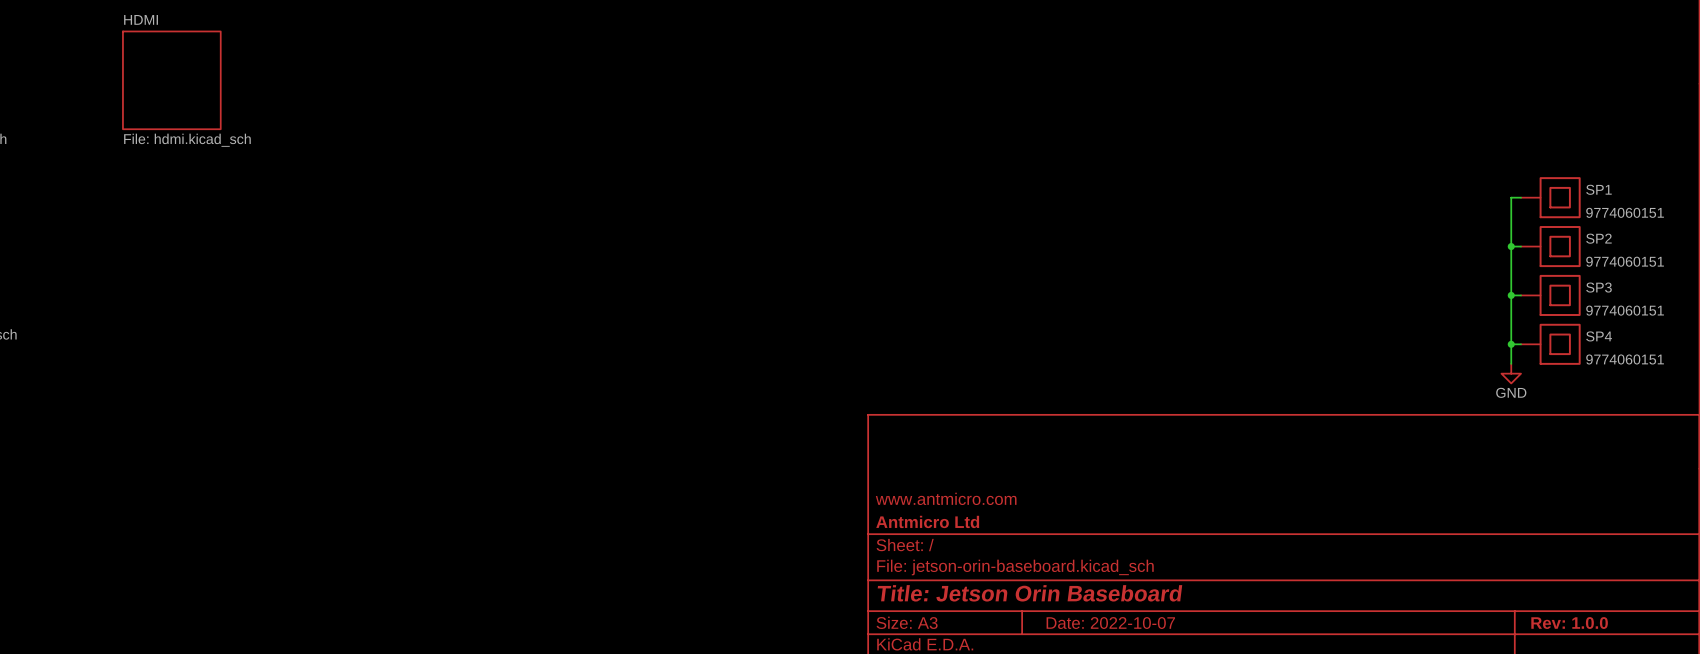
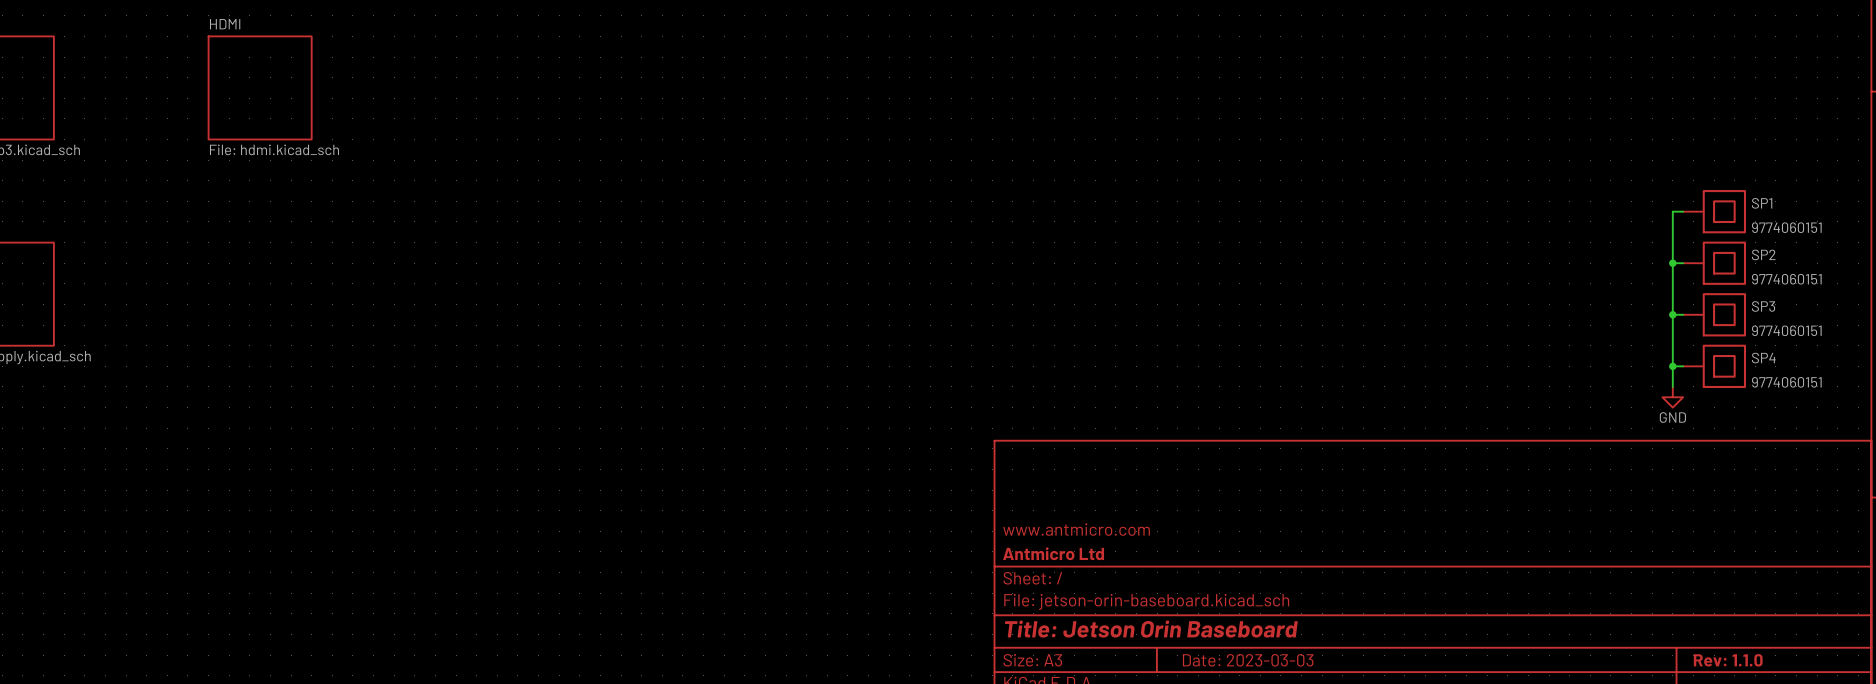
title block: Date: 2022-10-07 (1110, 623) -> Date: 2023-03-03 (1248, 660)
title block: Rev: 1.0.0 (1569, 623) -> Rev: 1.1.0 (1728, 660)

